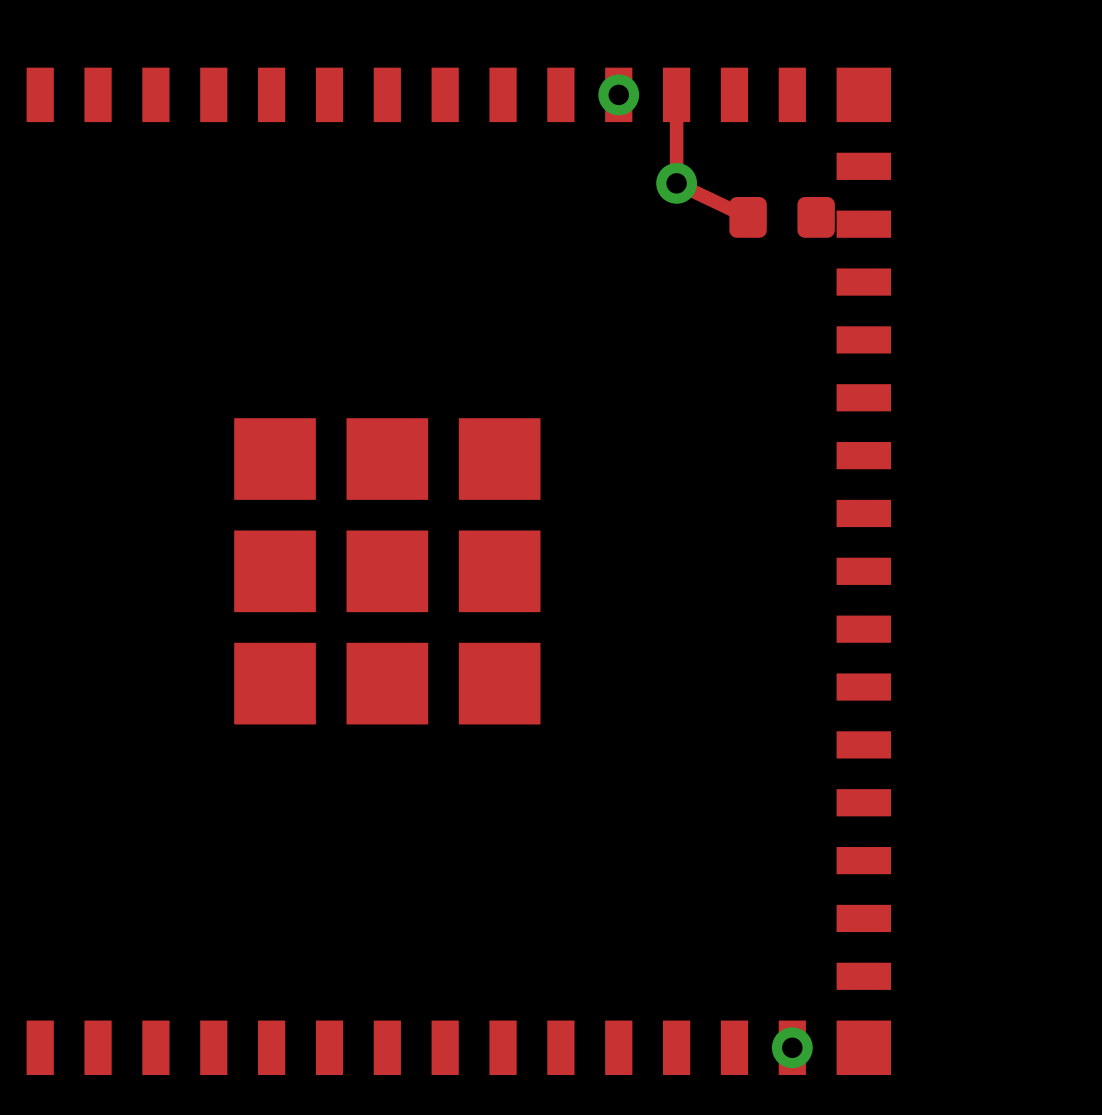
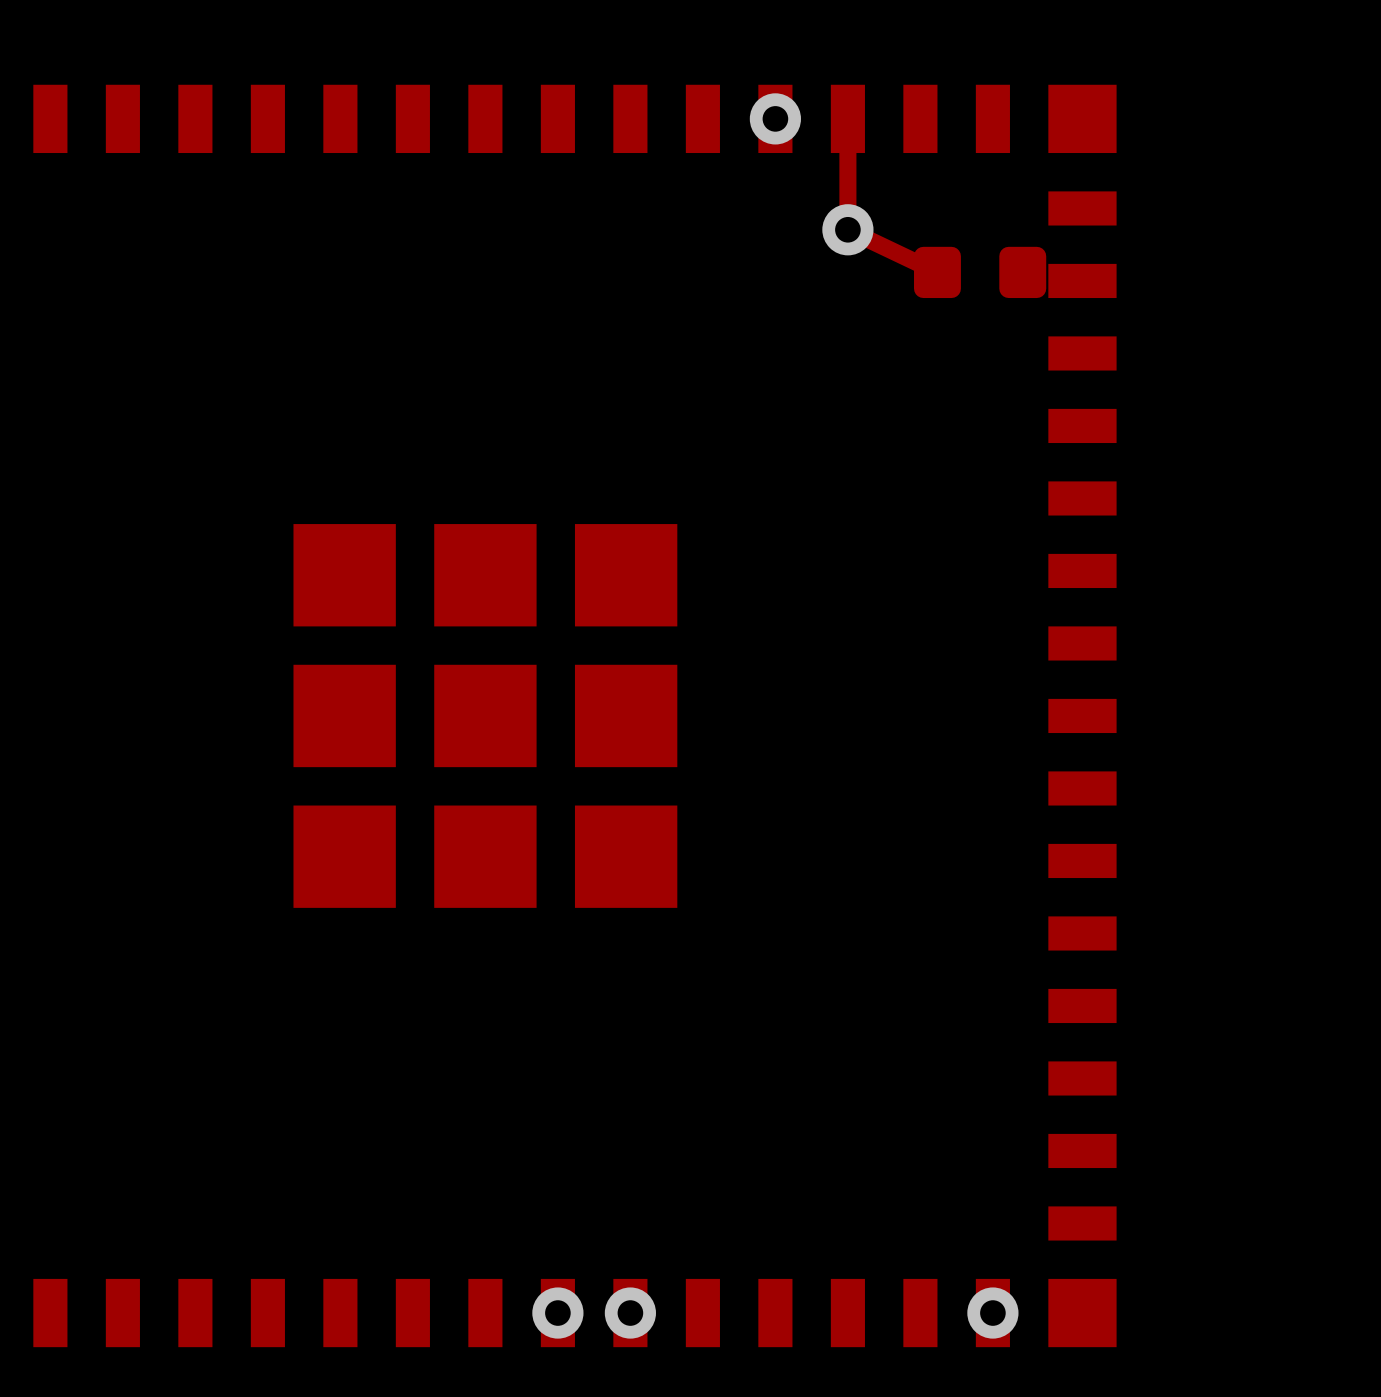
via: none -> (557, 1313)
via: none -> (630, 1313)

